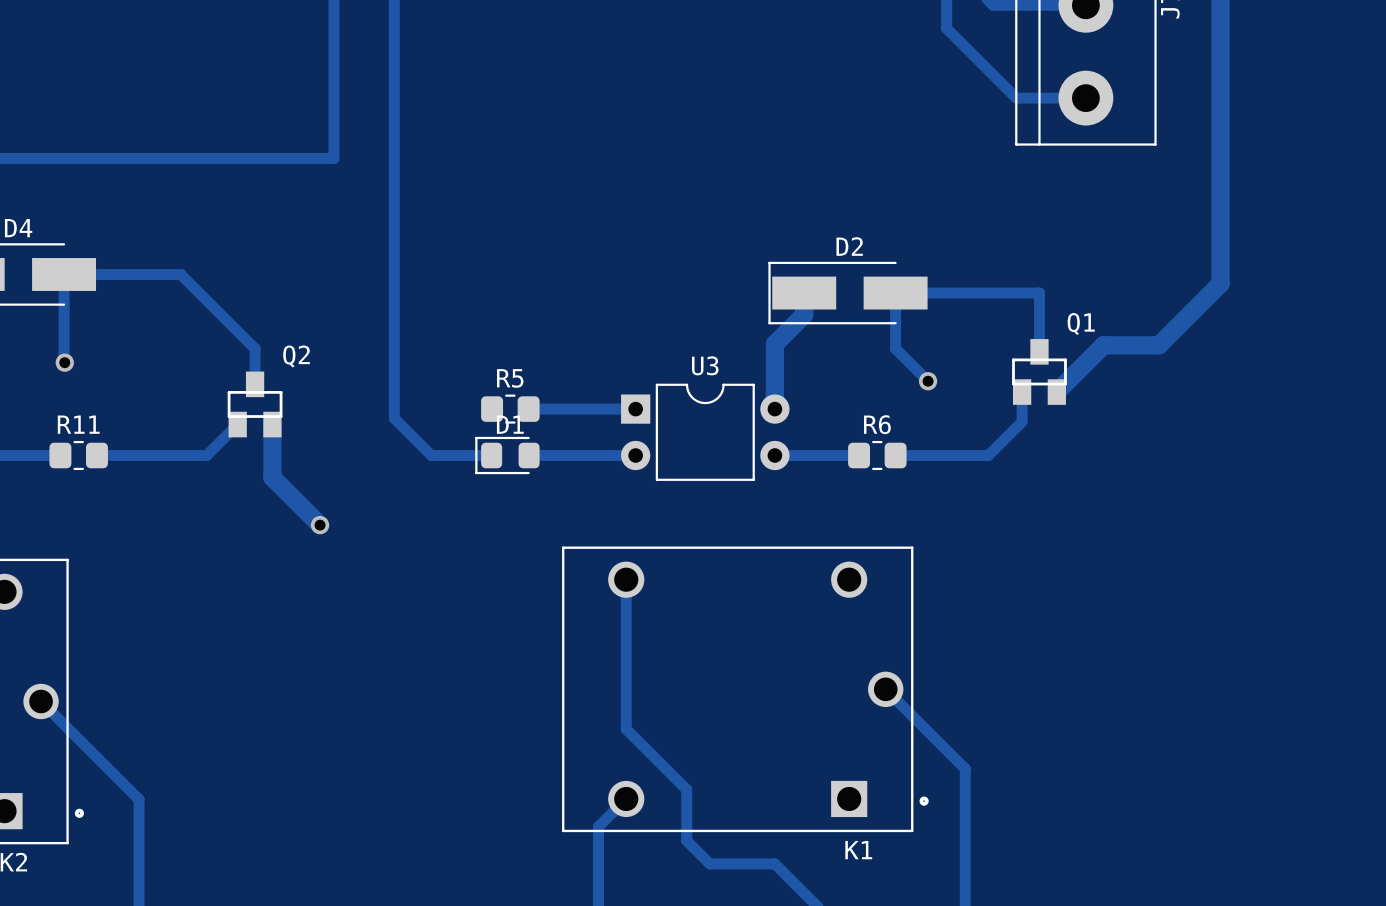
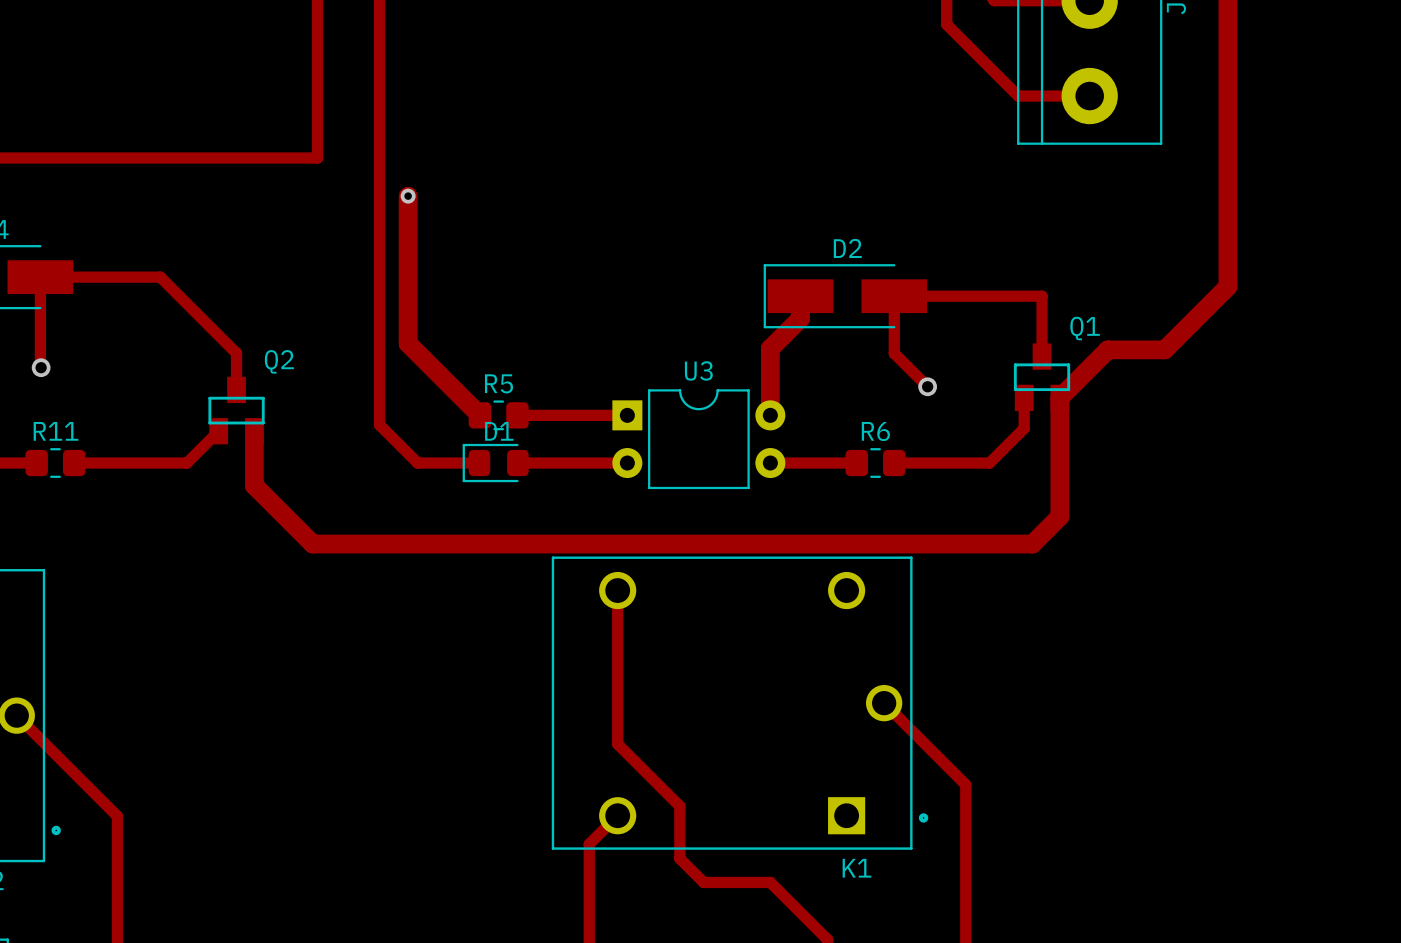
track: none -> (408, 196) (408, 343) (479, 415)
via: none -> (408, 196)
track: none -> (1059, 397) (1059, 516) (1032, 544) (312, 544) (303, 534)
via: (320, 525) -> none

